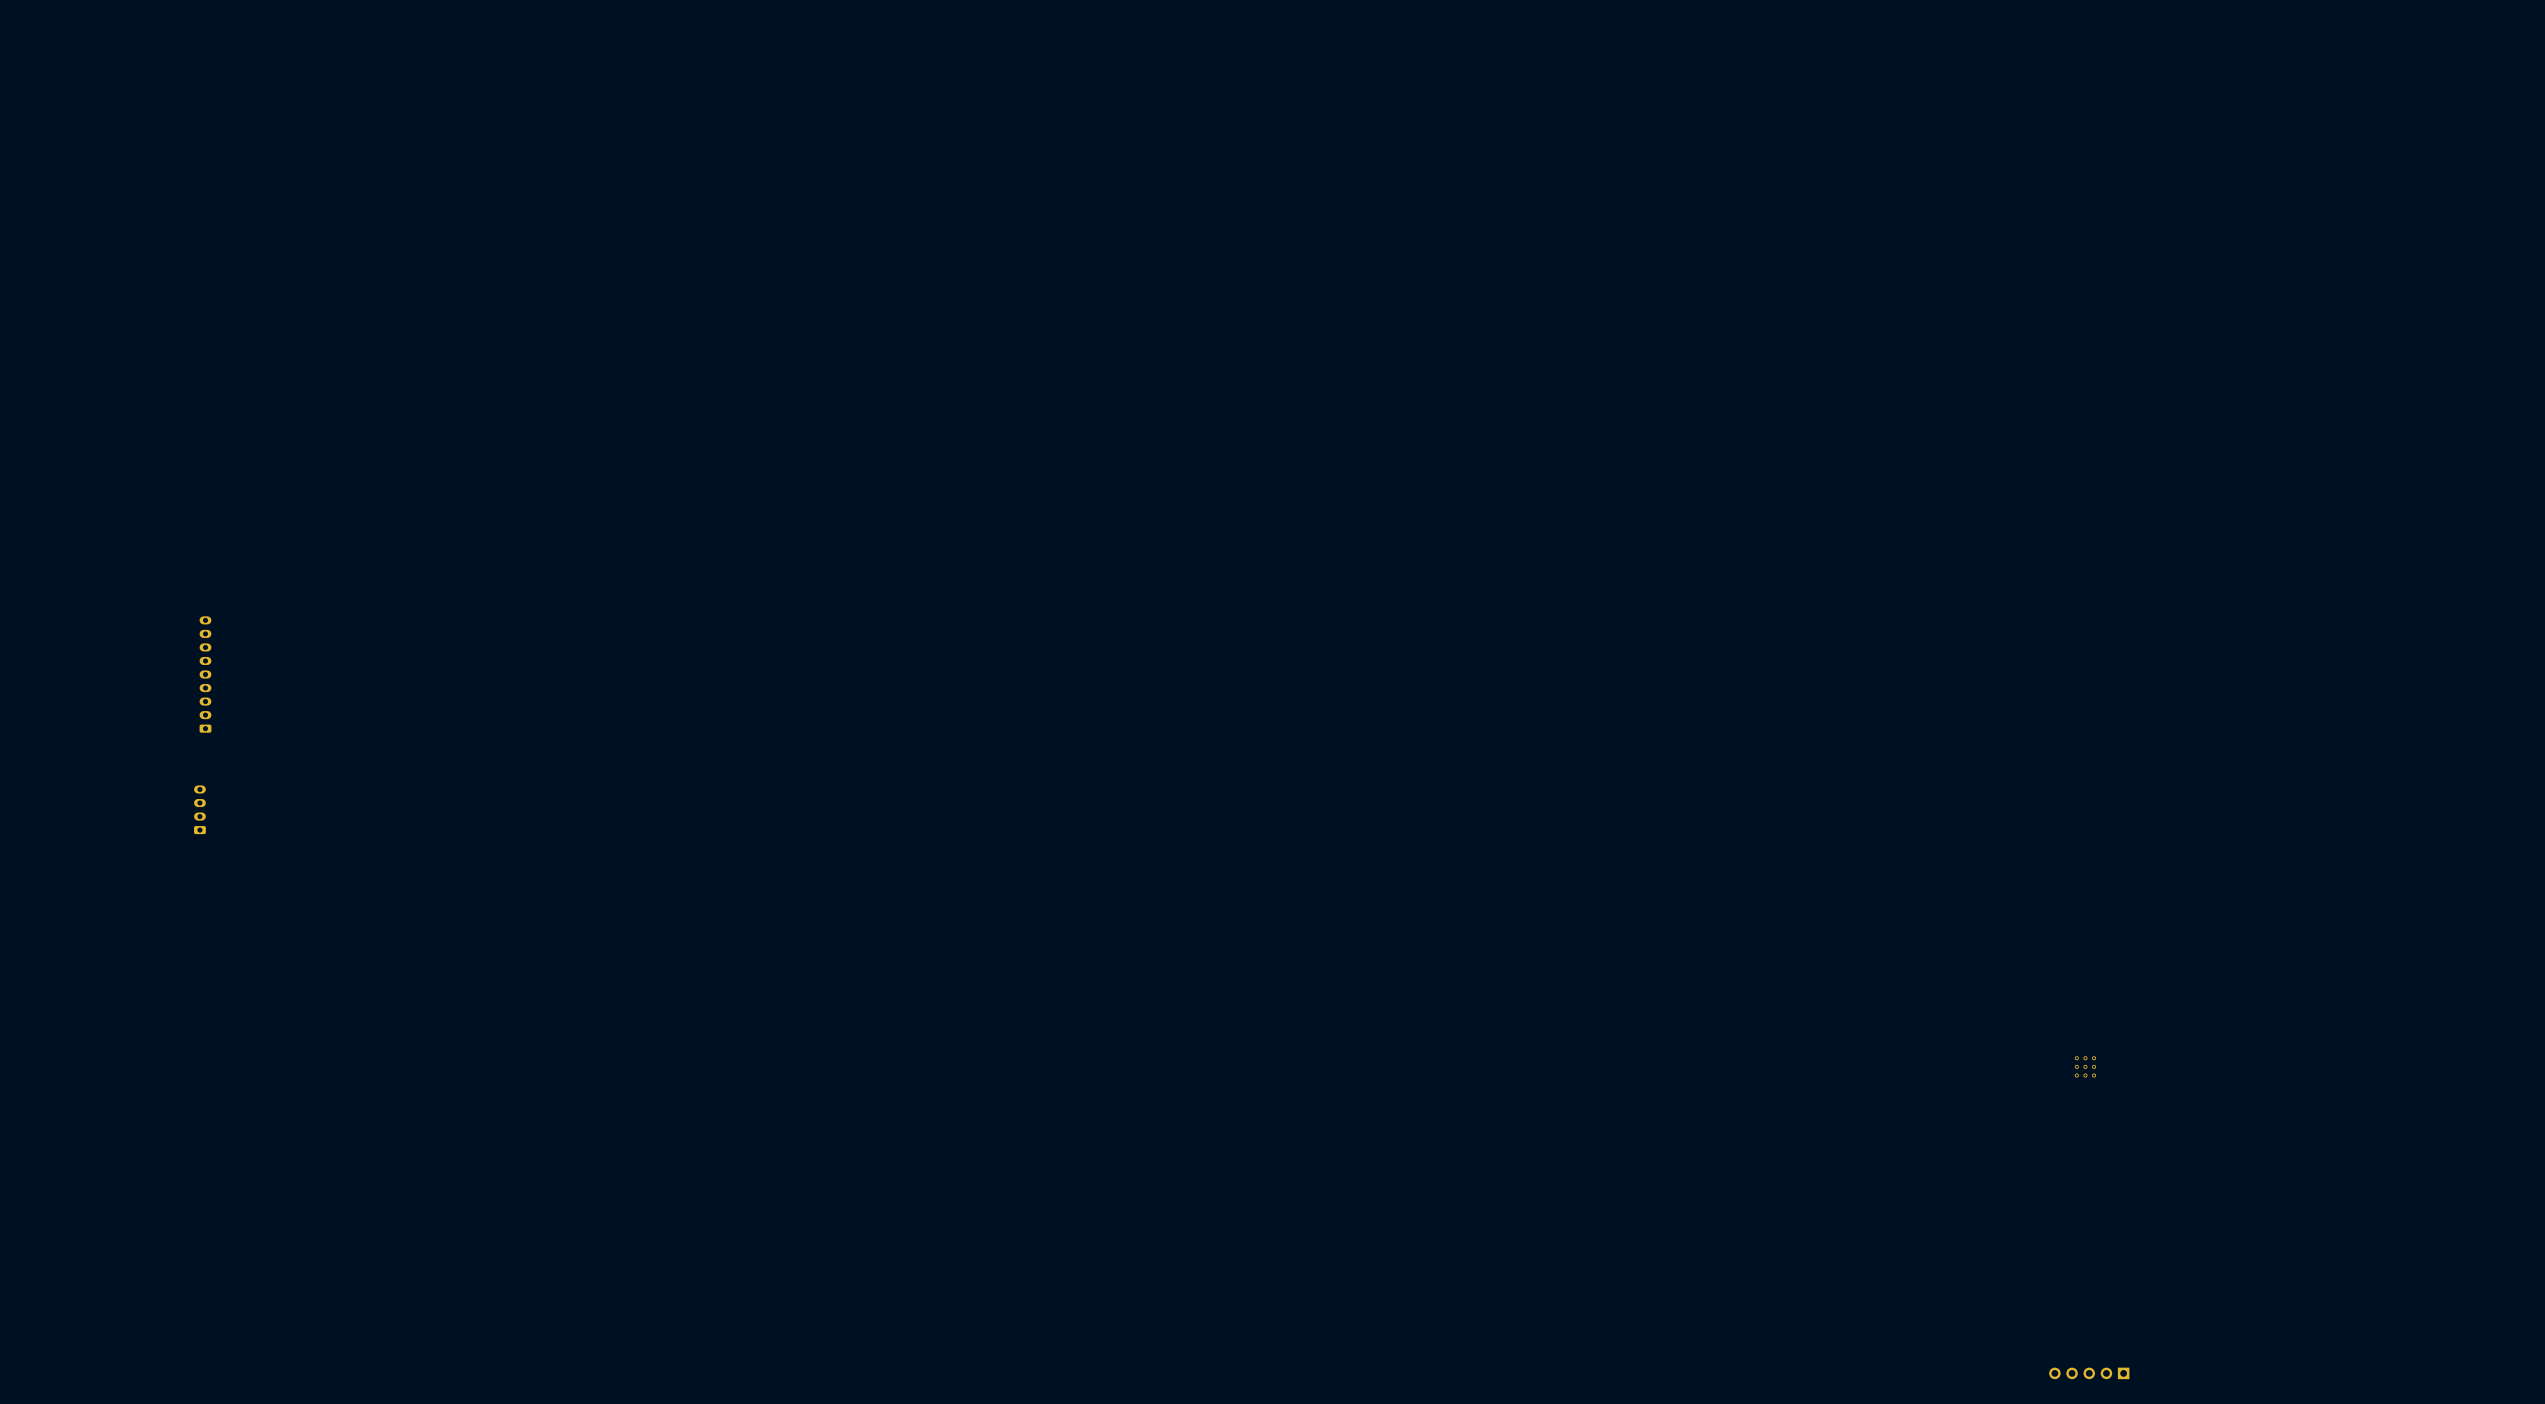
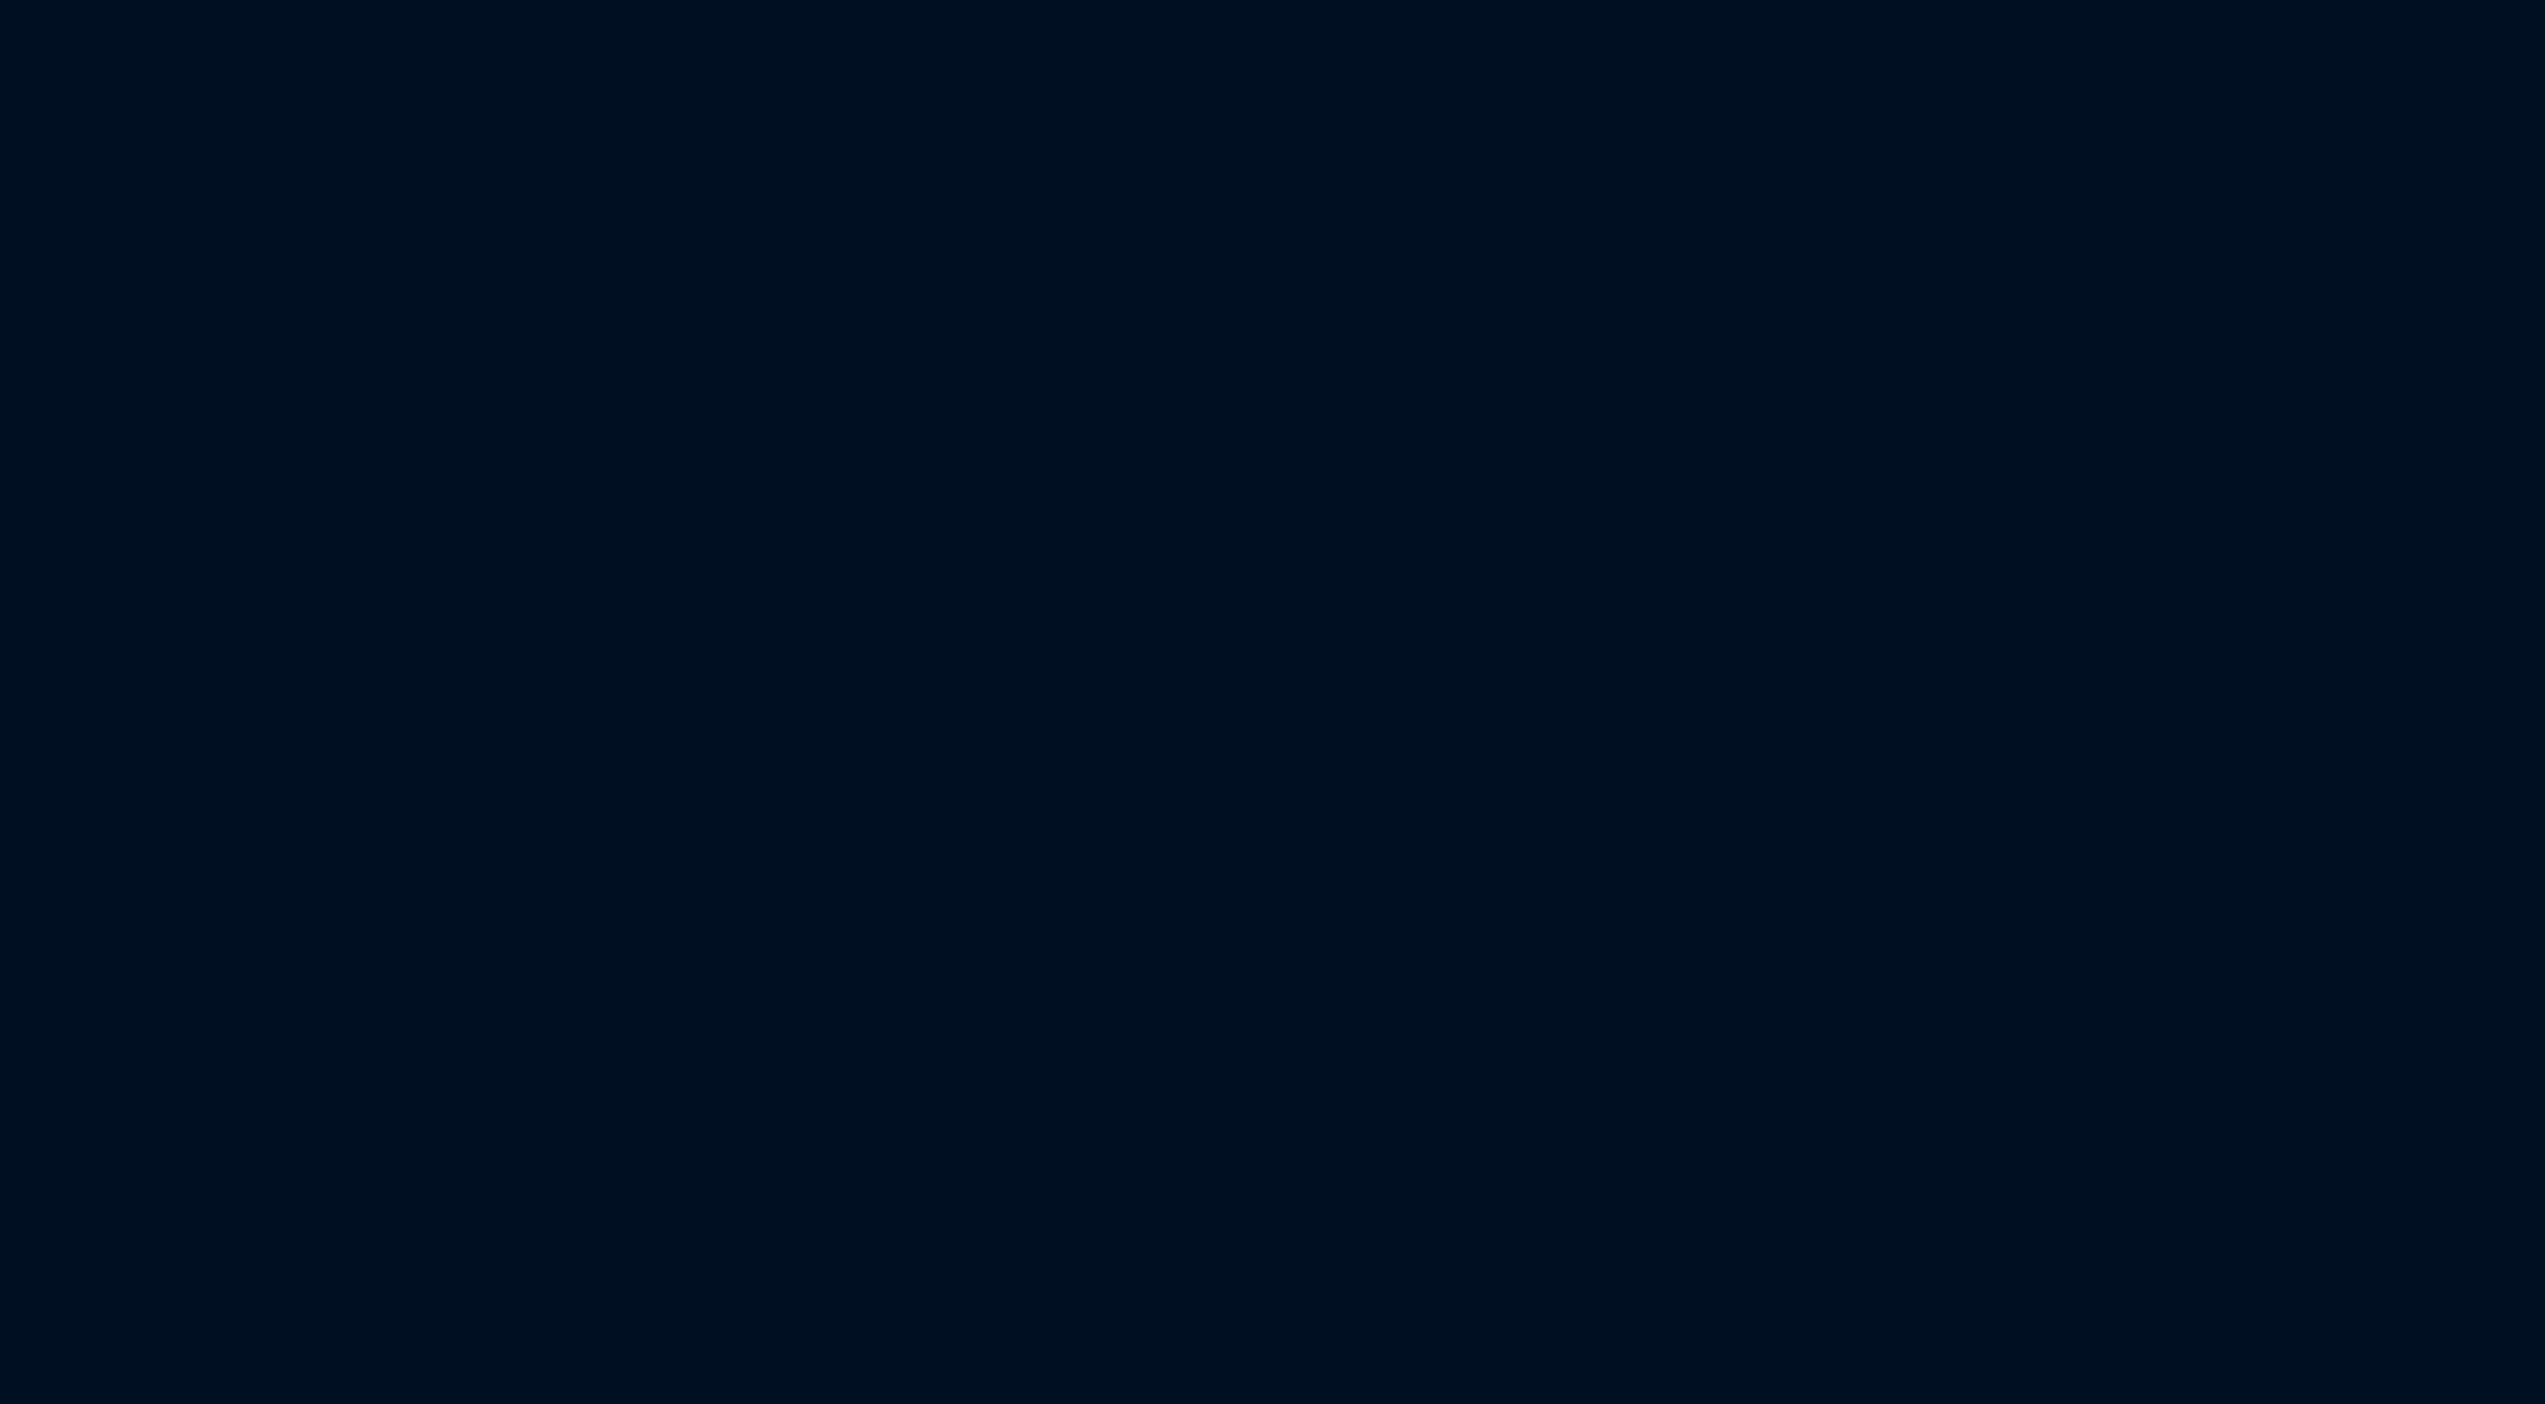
part: (205, 674) -> none
part: (199, 809) -> none
part: (2085, 1066) -> none
part: (2089, 1373) -> none

